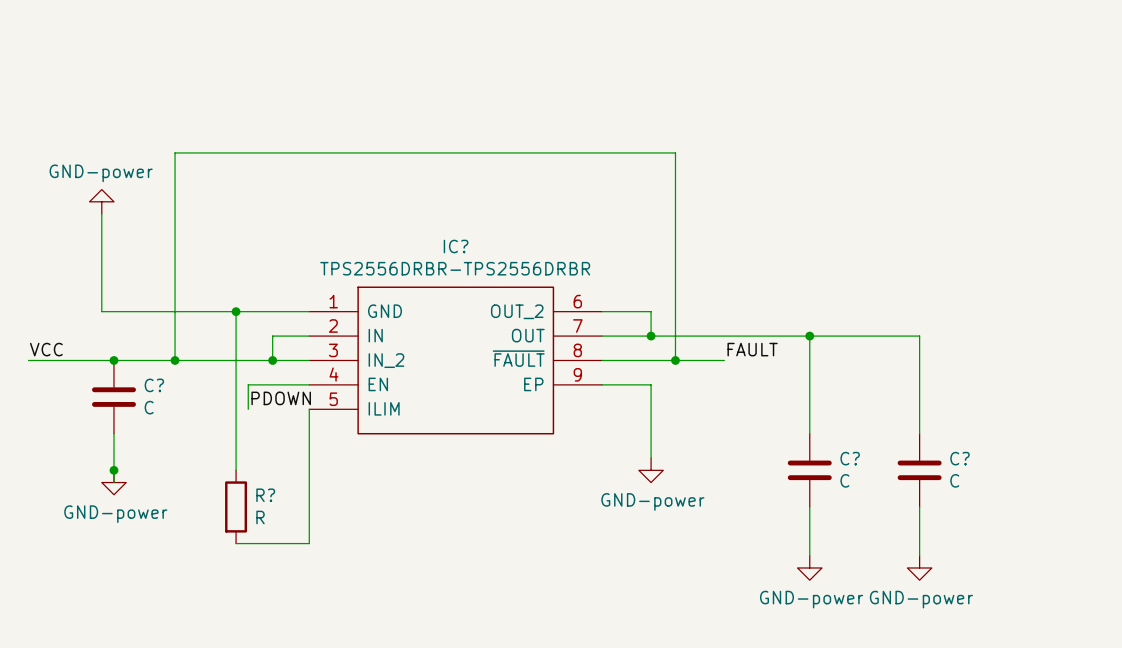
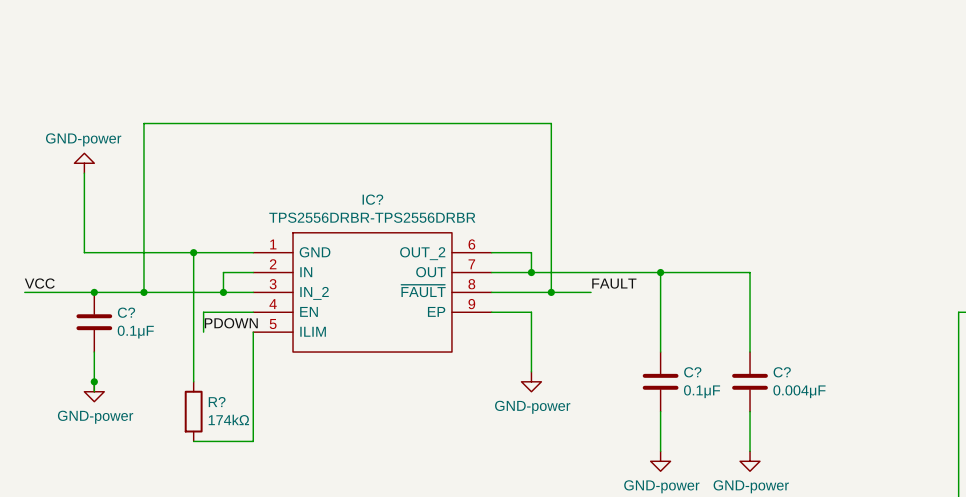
C? value: C (149, 407) -> 0.1μF (135, 332)
C? value: C (844, 480) -> 0.1μF (702, 391)
C? value: C (954, 480) -> 0.004μF (799, 391)
R? value: R (260, 517) -> 174kΩ (228, 419)

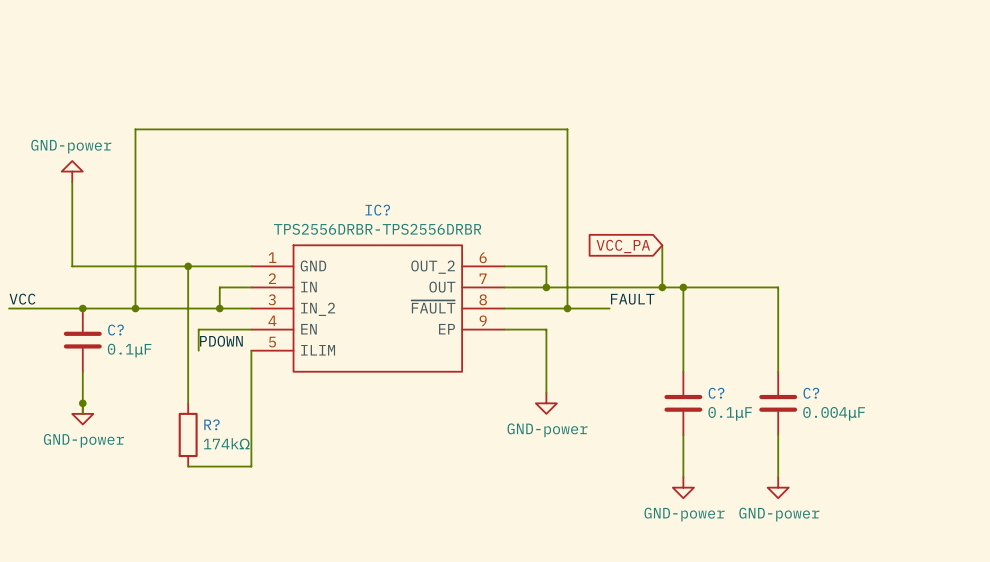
wire: none -> (662, 245) (662, 287)
global label: none -> VCC_PA (623, 246)
junction: none -> (662, 287)

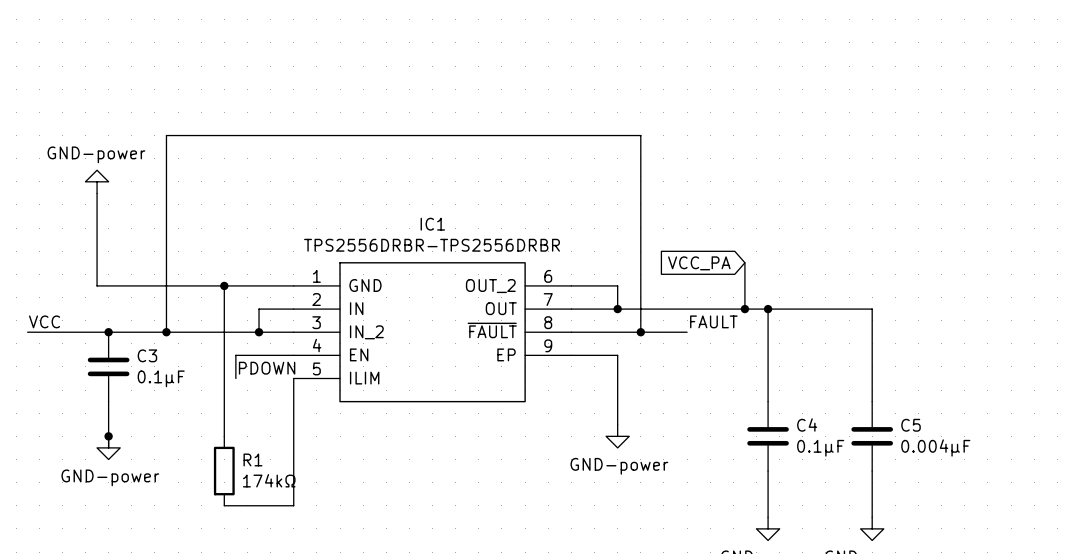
IC? name: IC? (377, 210) -> IC1 (432, 224)
C? name: C? (115, 330) -> C3 (147, 355)
C? name: C? (716, 393) -> C4 (807, 424)
C? name: C? (811, 393) -> C5 (911, 425)
R? name: R? (211, 424) -> R1 (252, 459)

